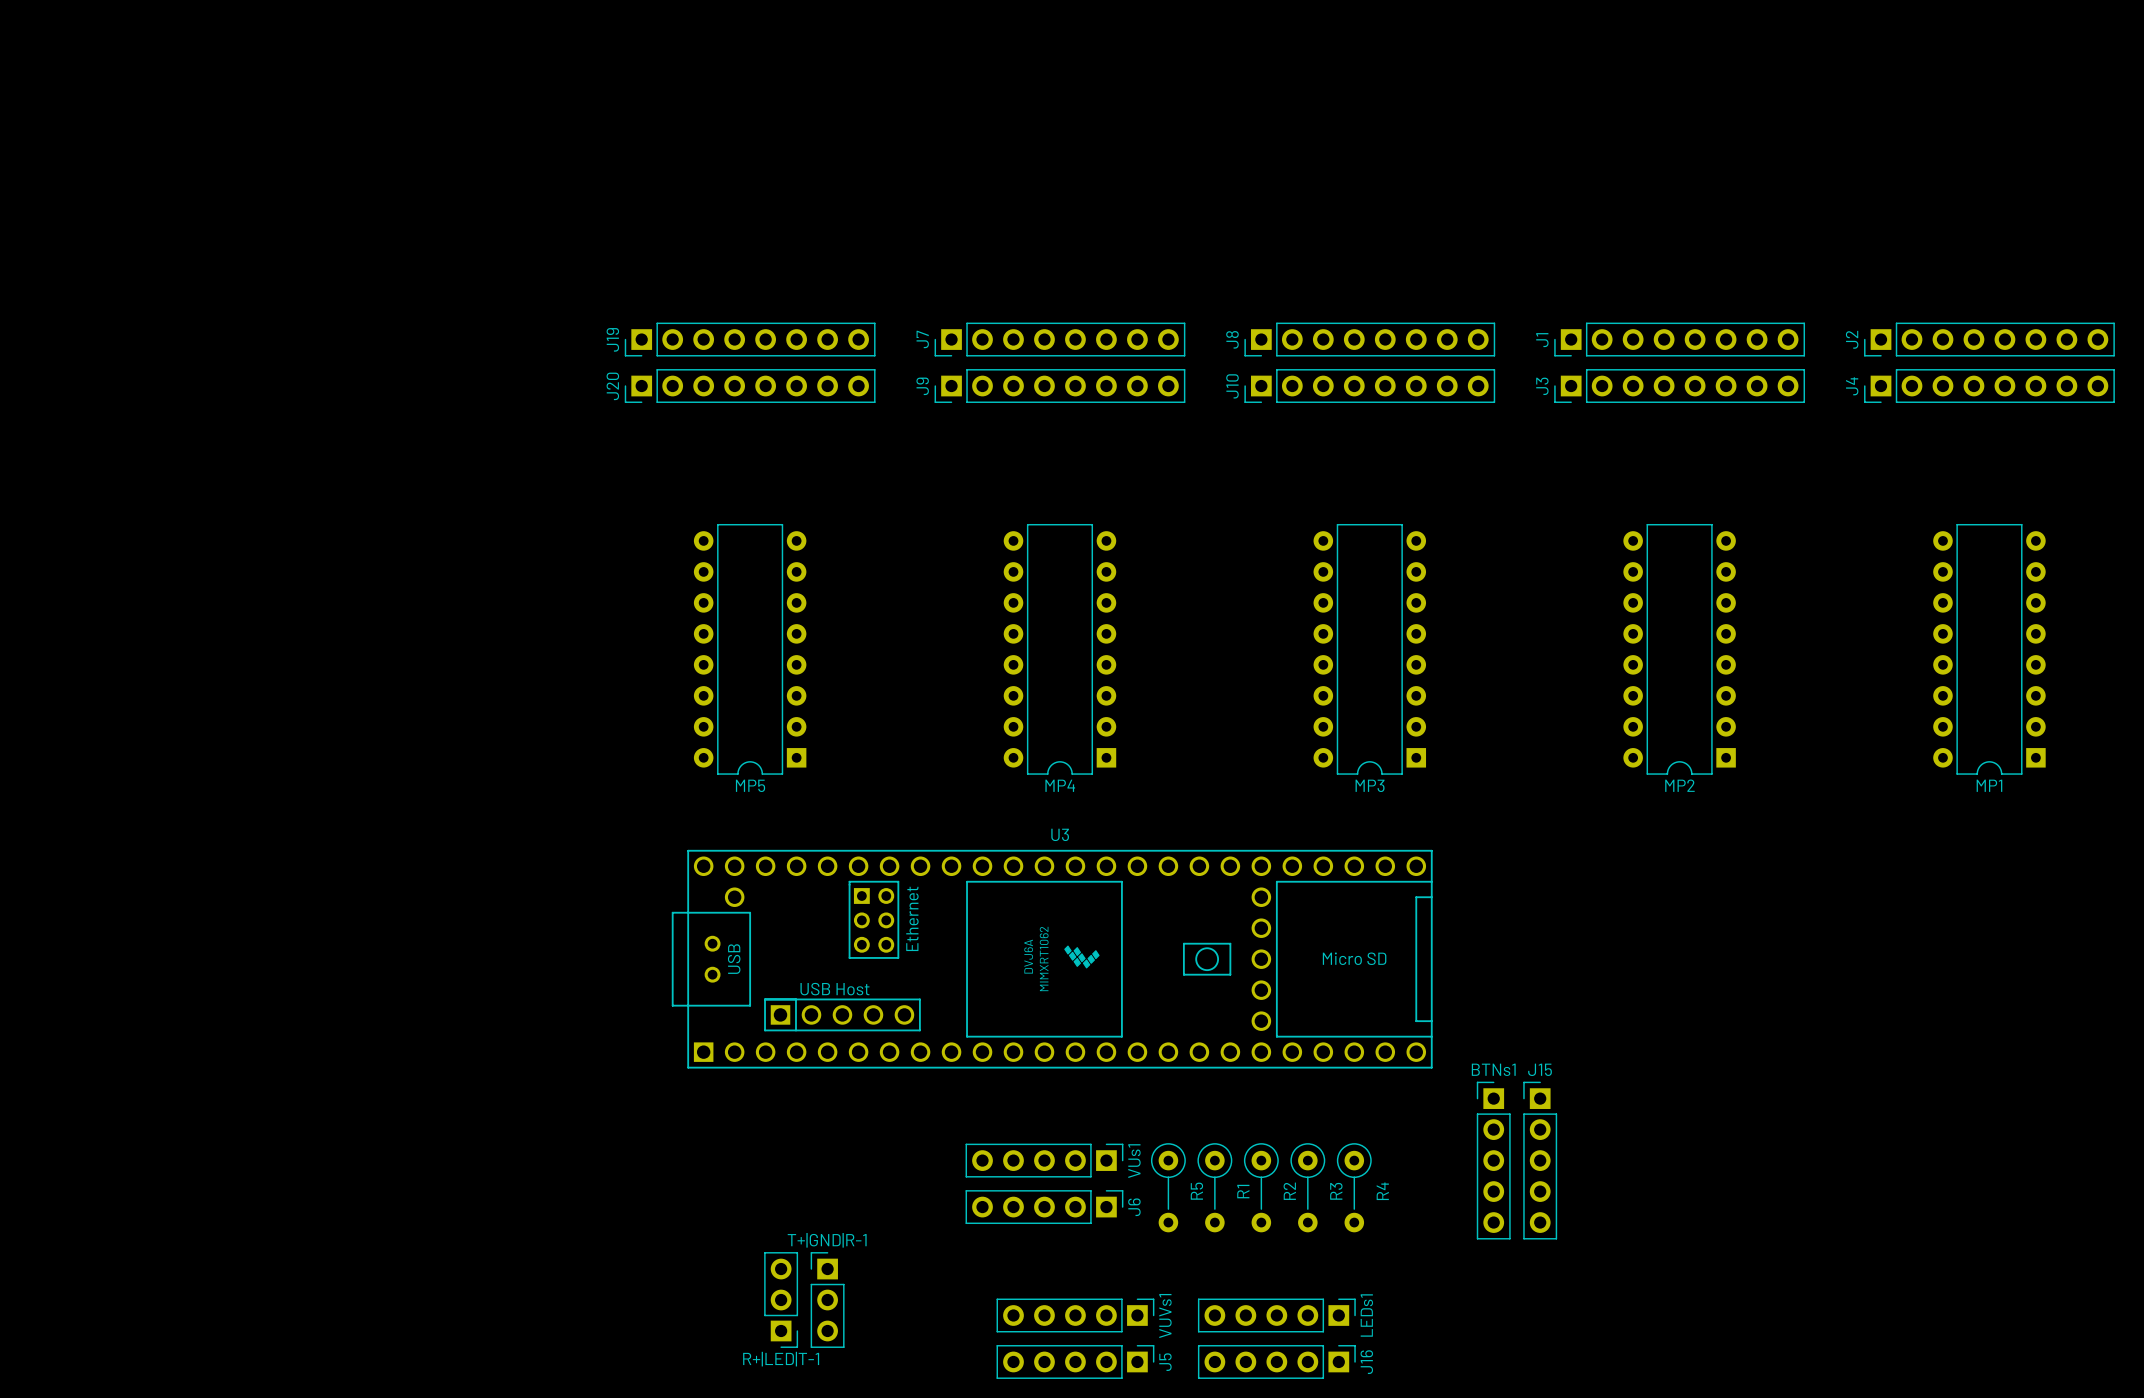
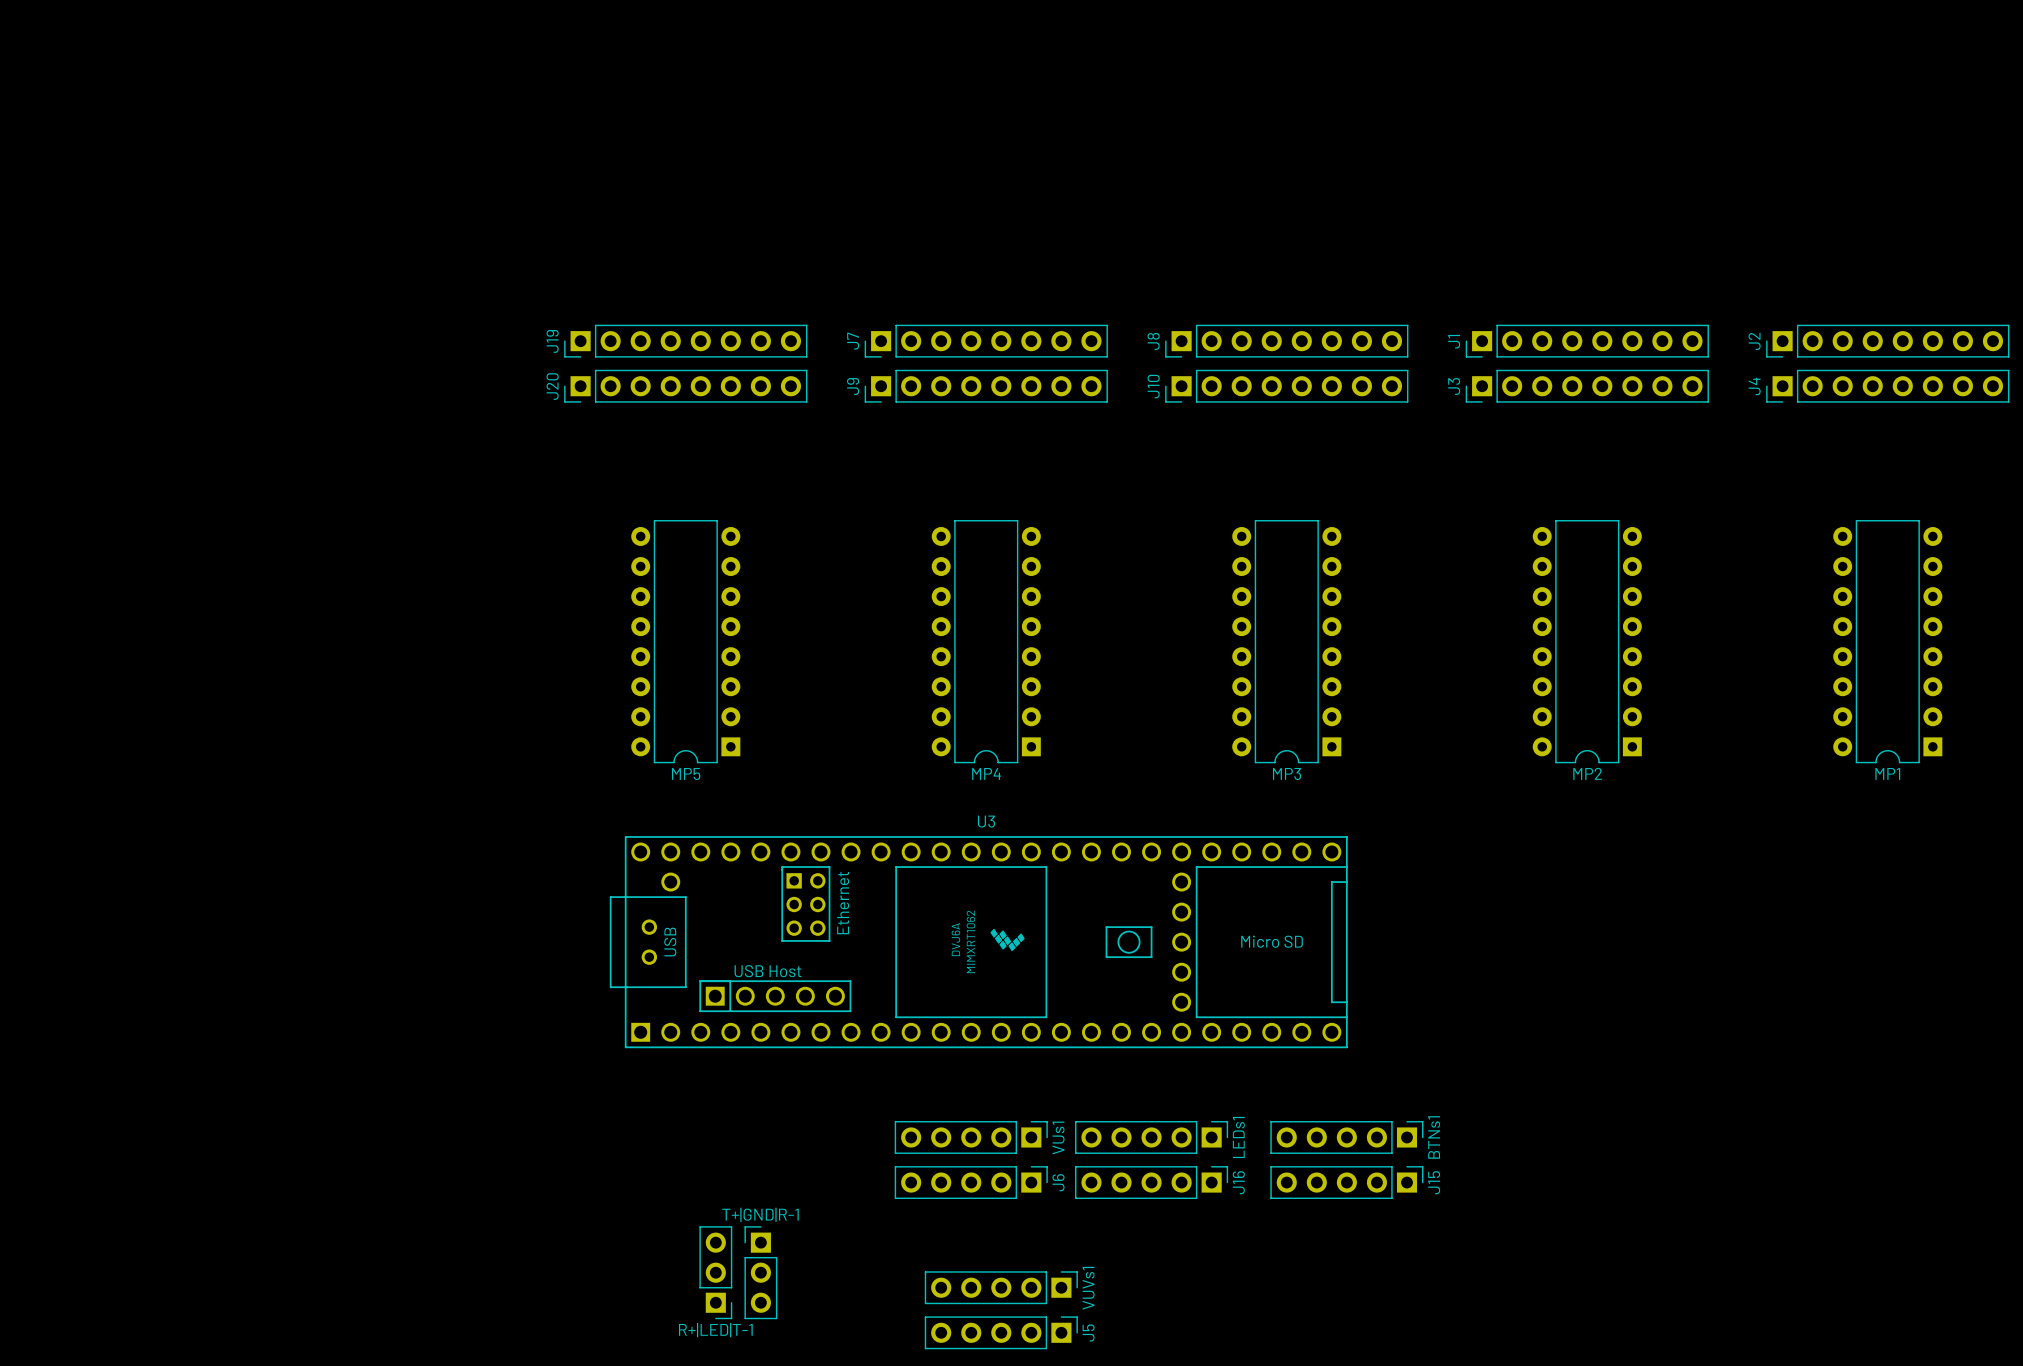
BTNs1 rotation: 0° (1493, 1160) -> 90° clockwise (1346, 1137)
J15 rotation: 0° (1540, 1160) -> 90° clockwise (1346, 1182)
J15 position: (1540, 1160) -> (1346, 1182)
R5: (1168, 1187) -> none
R1: (1214, 1187) -> none
R2: (1261, 1187) -> none
R3: (1307, 1187) -> none
R4: (1354, 1187) -> none
LEDs1 position: (1276, 1315) -> (1151, 1137)
J16 position: (1276, 1361) -> (1151, 1182)

